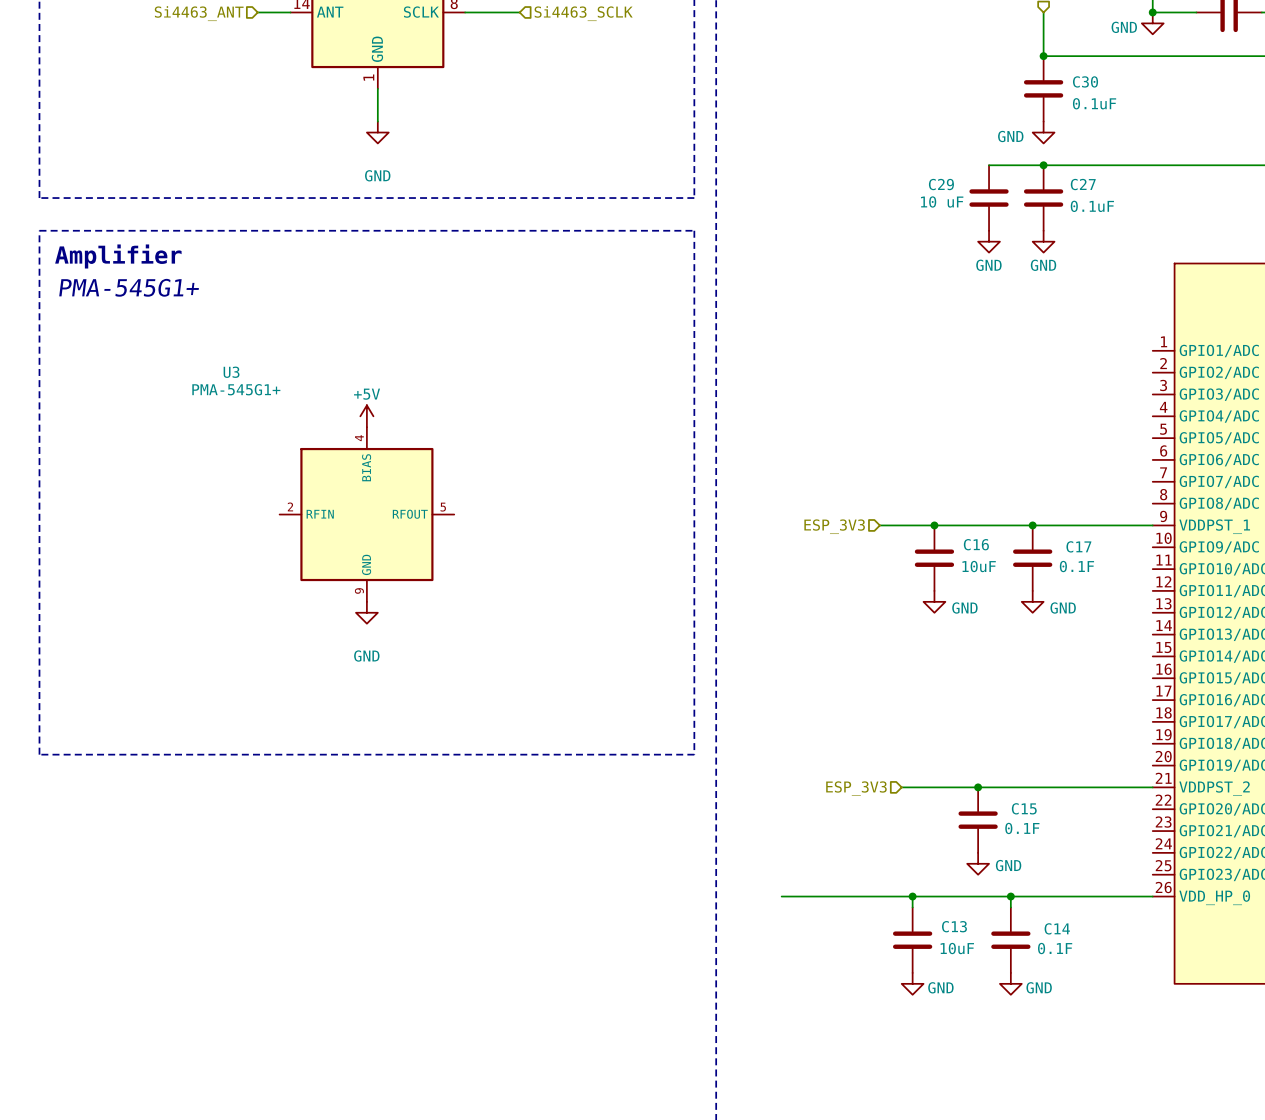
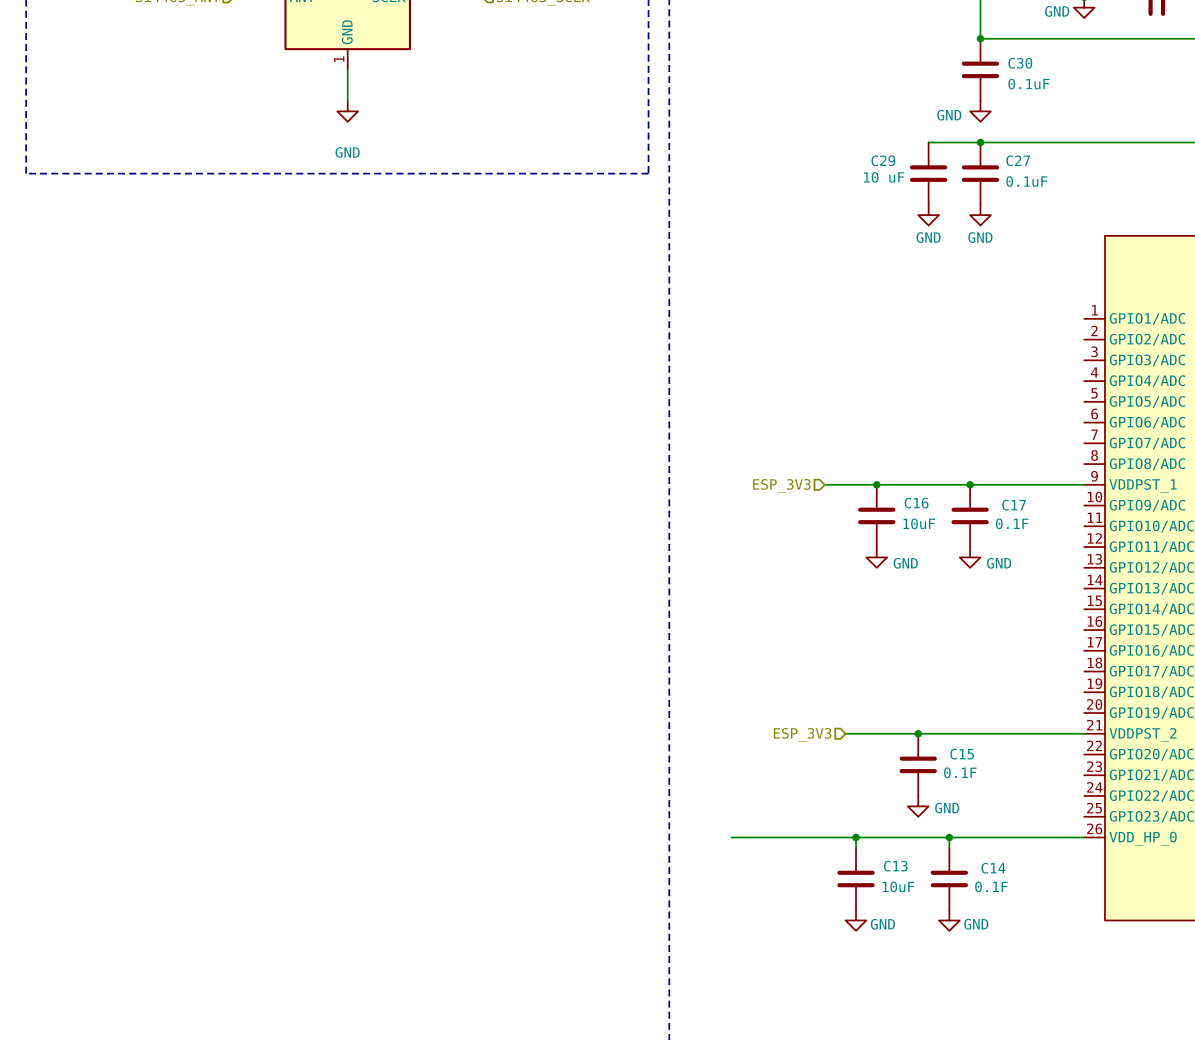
line: (39, 230) (694, 230) (694, 754) (39, 754) (39, 230) -> none
text: Amplifier (118, 256) -> none
text: PMA-545G1+ (129, 287) -> none
power symbol: +5V (366, 416) -> none
U3: PMA-545G1+ (366, 514) -> none
power symbol: GND (366, 612) -> none

